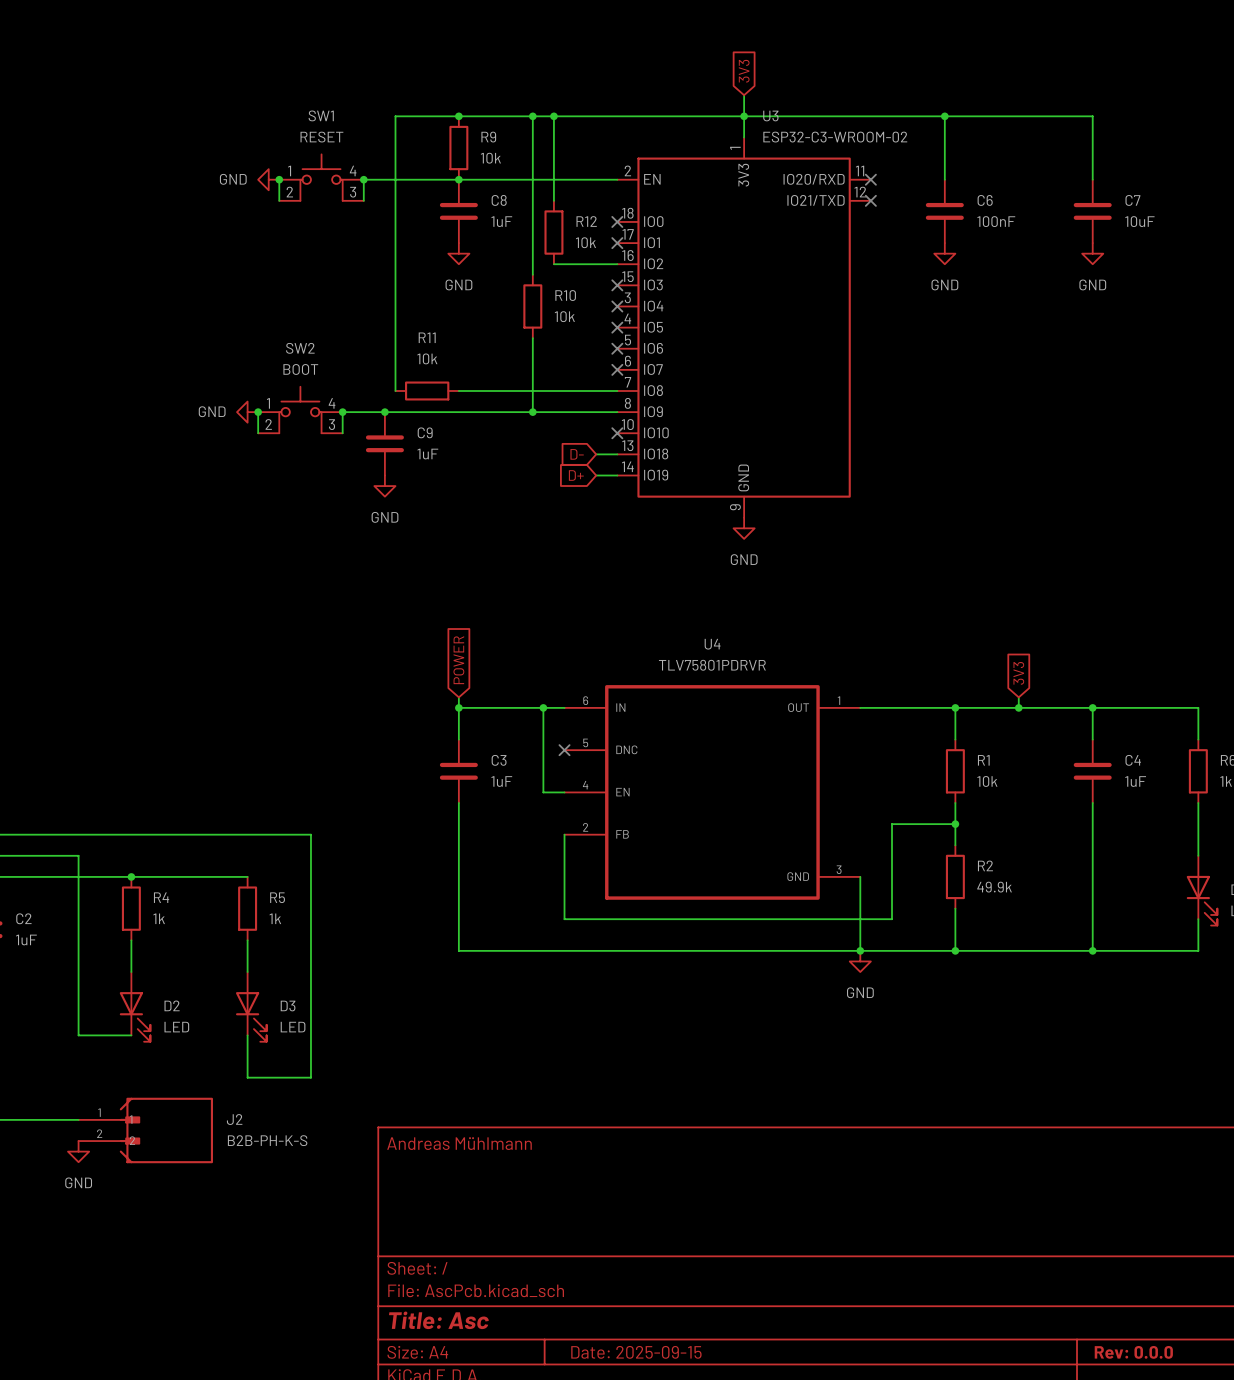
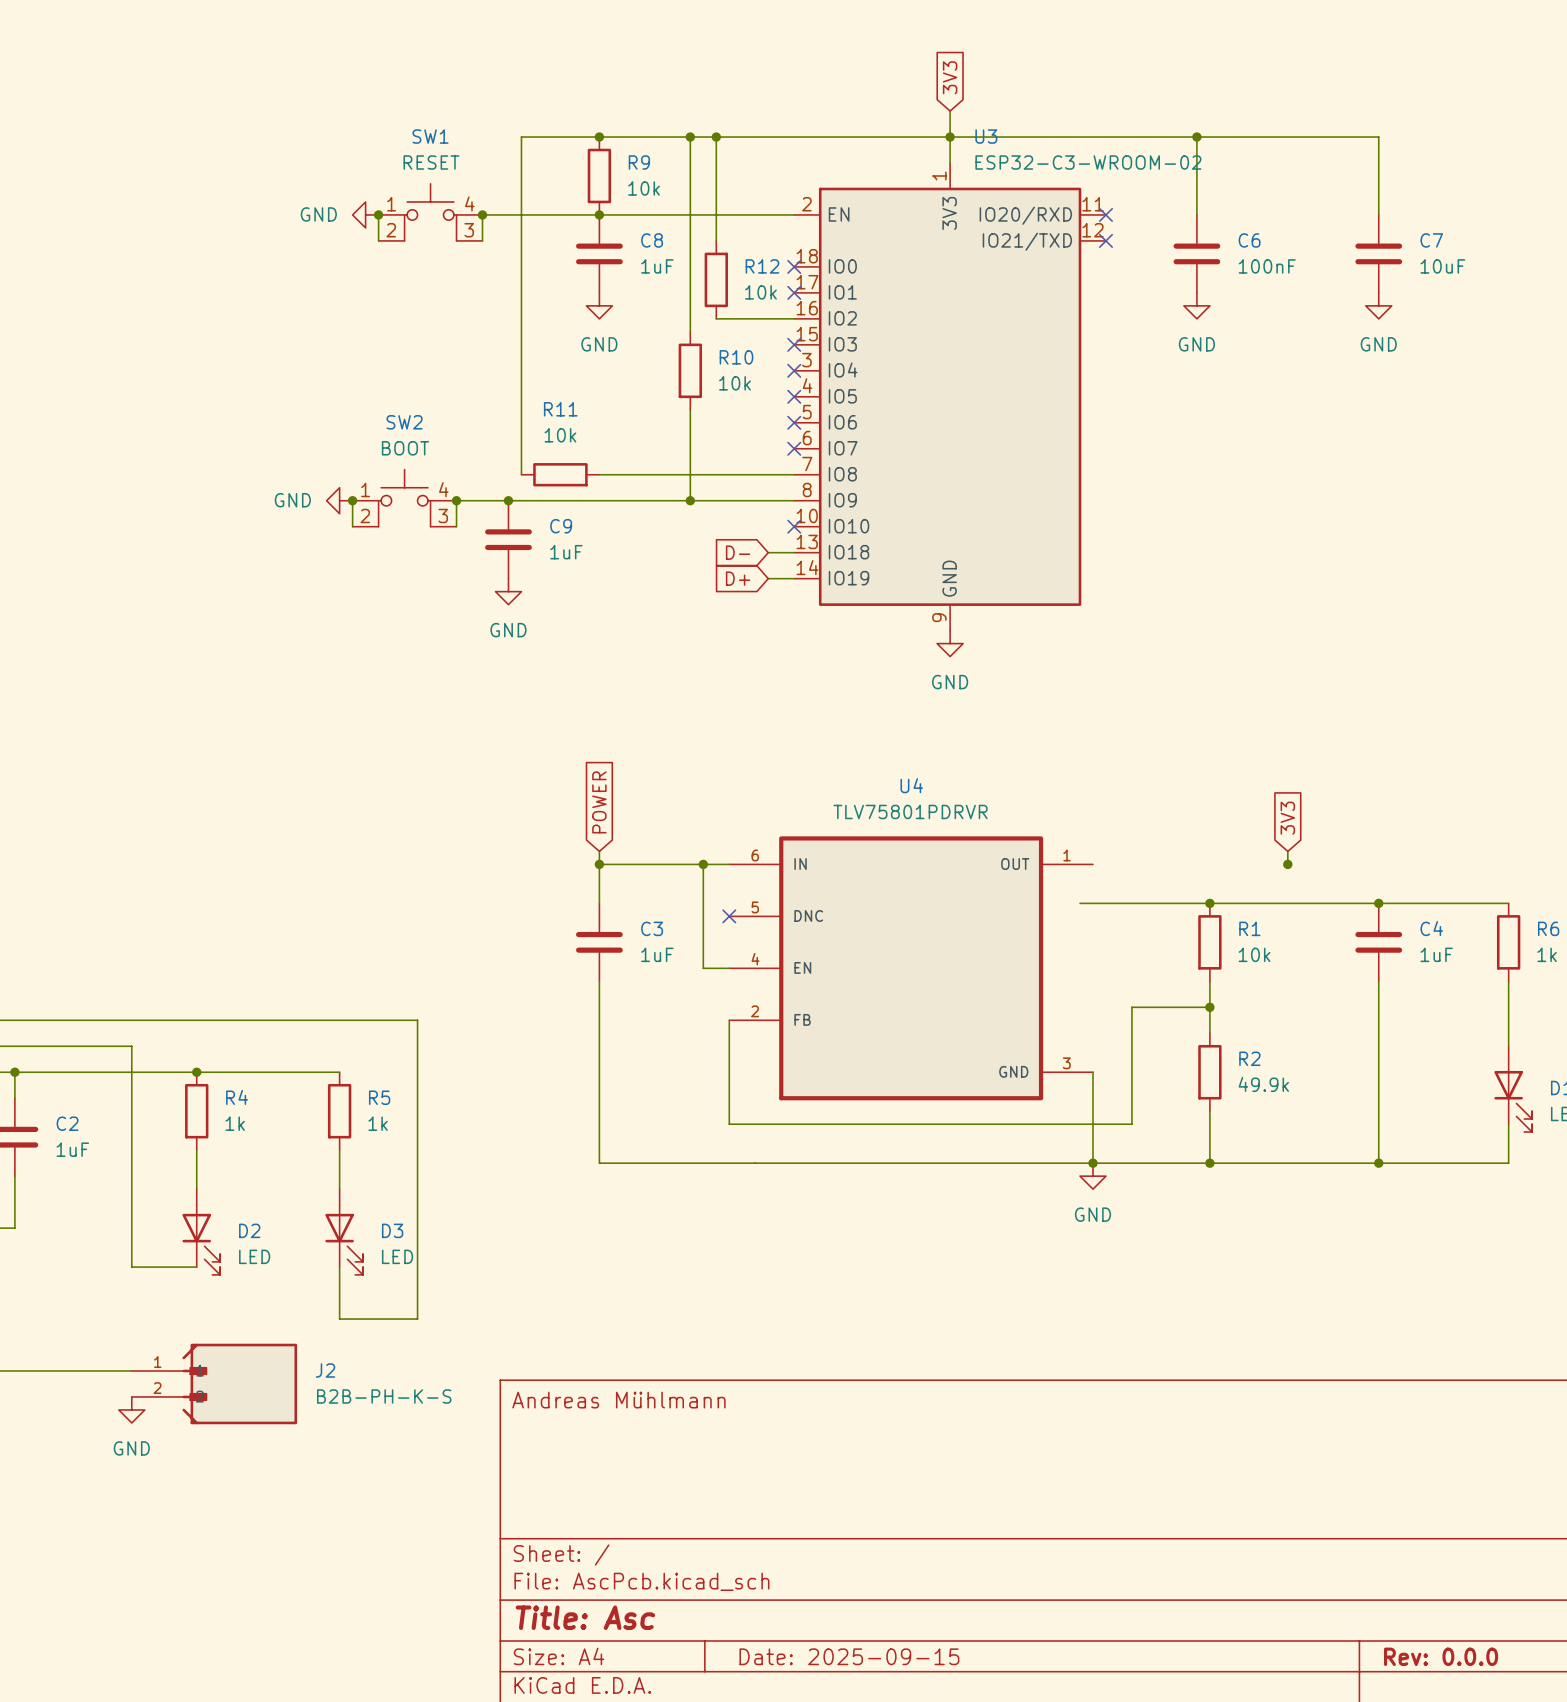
wire: (860, 707) (1198, 707) (1198, 739) -> (1080, 903) (1508, 903)
wire: (955, 707) (955, 739) -> none
junction position: (955, 707) -> (1209, 903)
wire: (1092, 707) (1092, 739) -> none
junction position: (1092, 707) -> (1378, 903)

